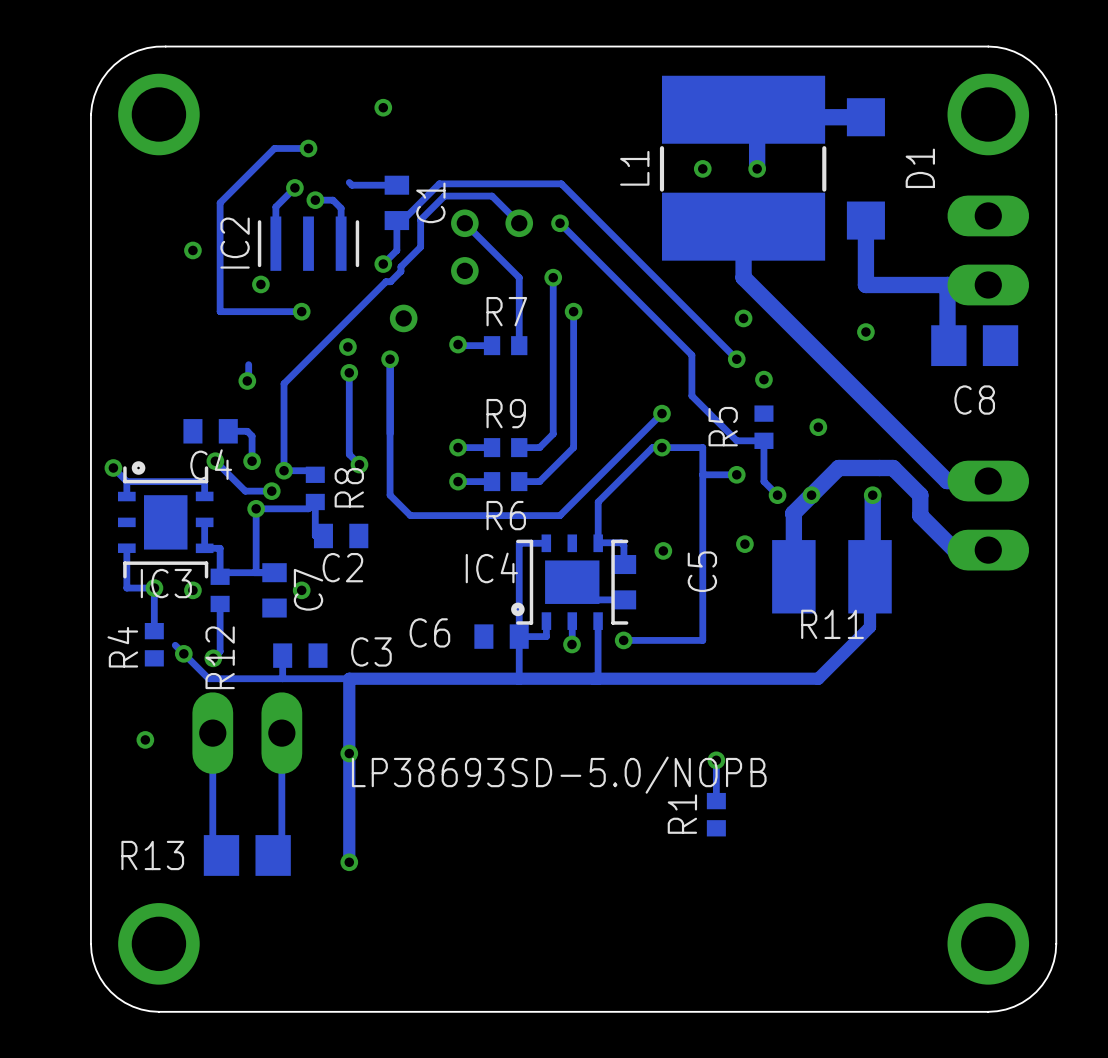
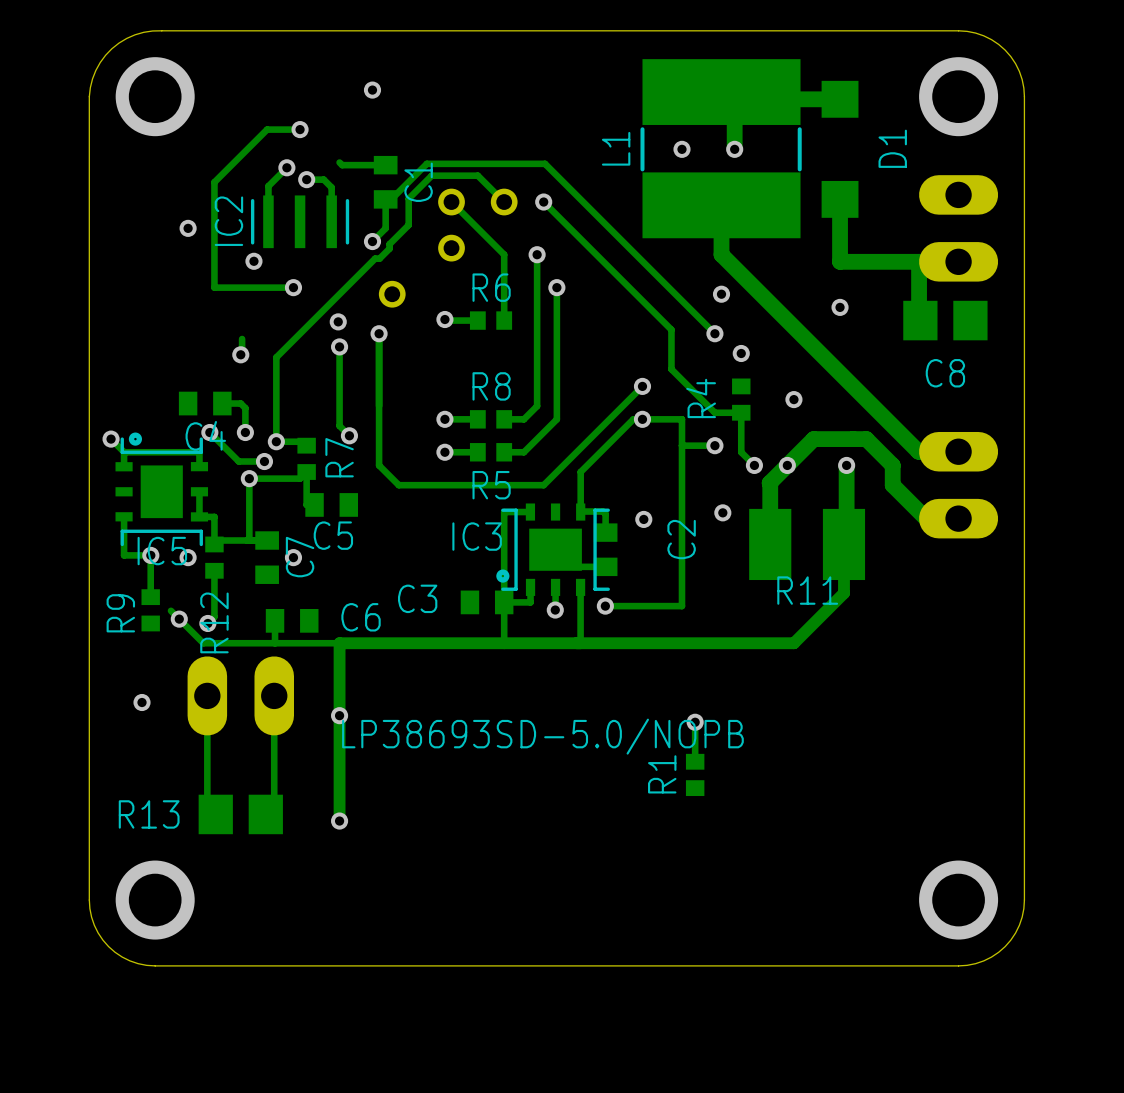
R7 name: R7 (506, 311) -> R6 (491, 287)
R9 name: R9 (506, 413) -> R8 (491, 386)
R5 name: R5 (723, 426) -> R4 (701, 398)
R8 name: R8 (349, 487) -> R7 (339, 457)
R6 name: R6 (506, 515) -> R5 (491, 485)
C2 name: C2 (342, 567) -> C5 (333, 535)
IC4 name: IC4 (491, 567) -> IC3 (477, 536)
C5 name: C5 (702, 571) -> C2 (681, 539)
IC3 name: IC3 (166, 583) -> IC5 (162, 551)
C6 name: C6 (429, 632) -> C3 (417, 598)
R4 name: R4 (122, 647) -> R9 (120, 613)
C3 name: C3 (371, 651) -> C6 (361, 617)

